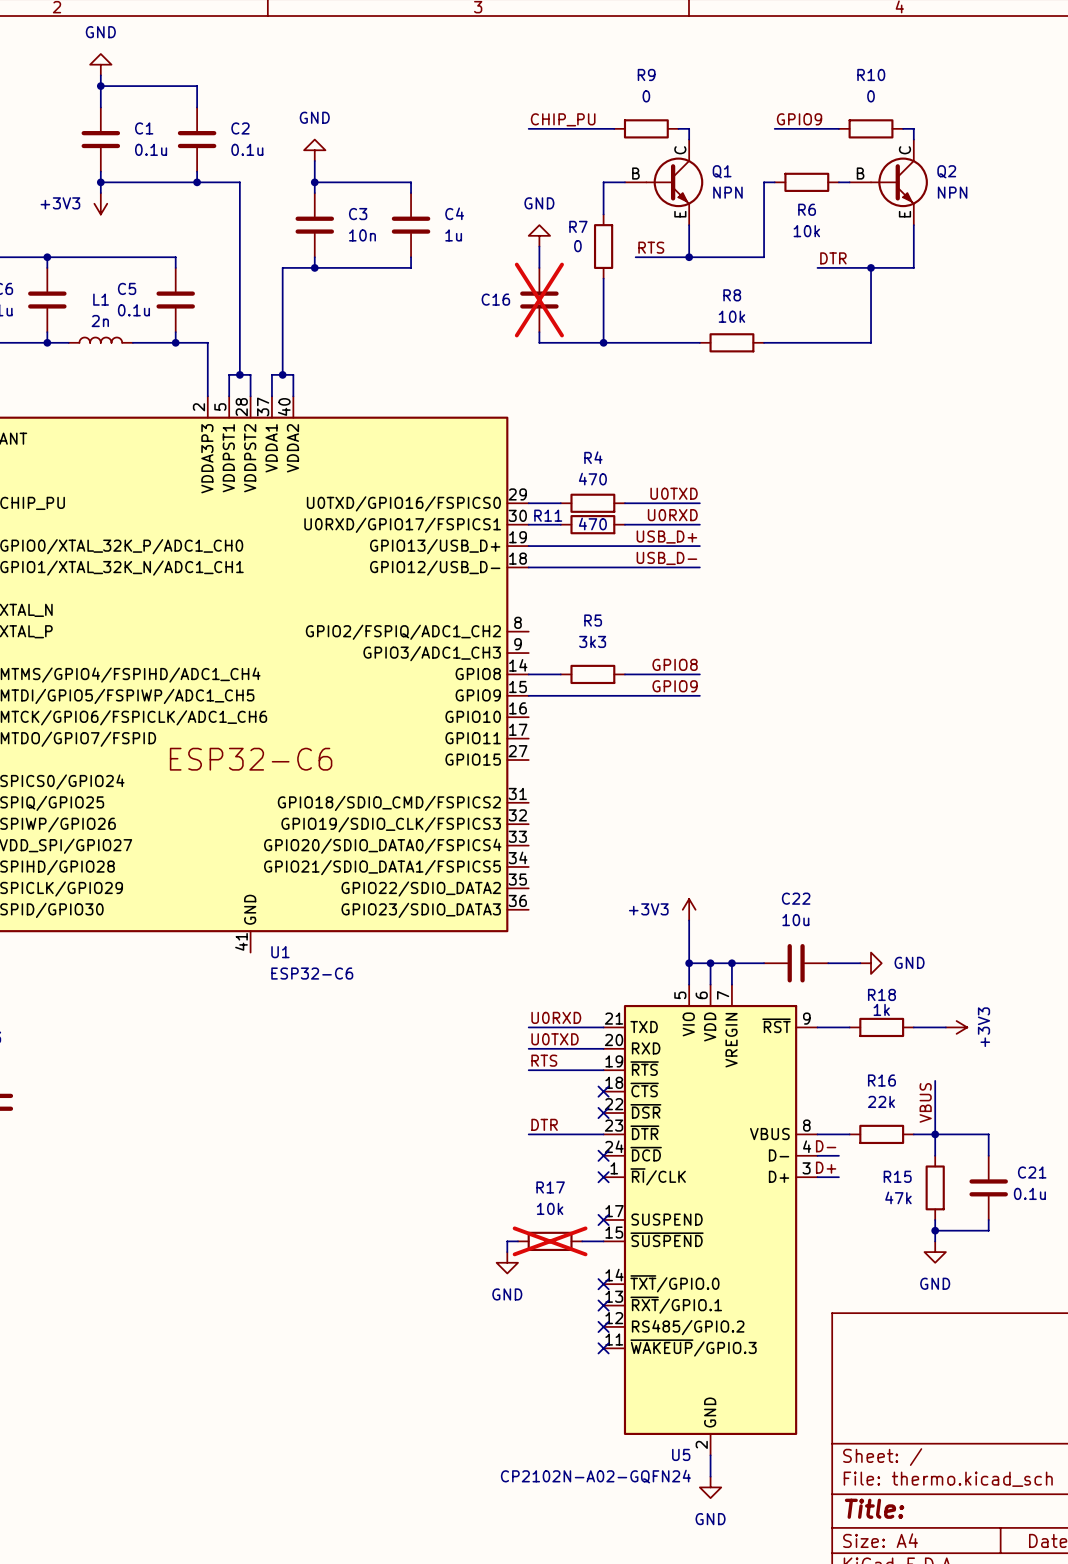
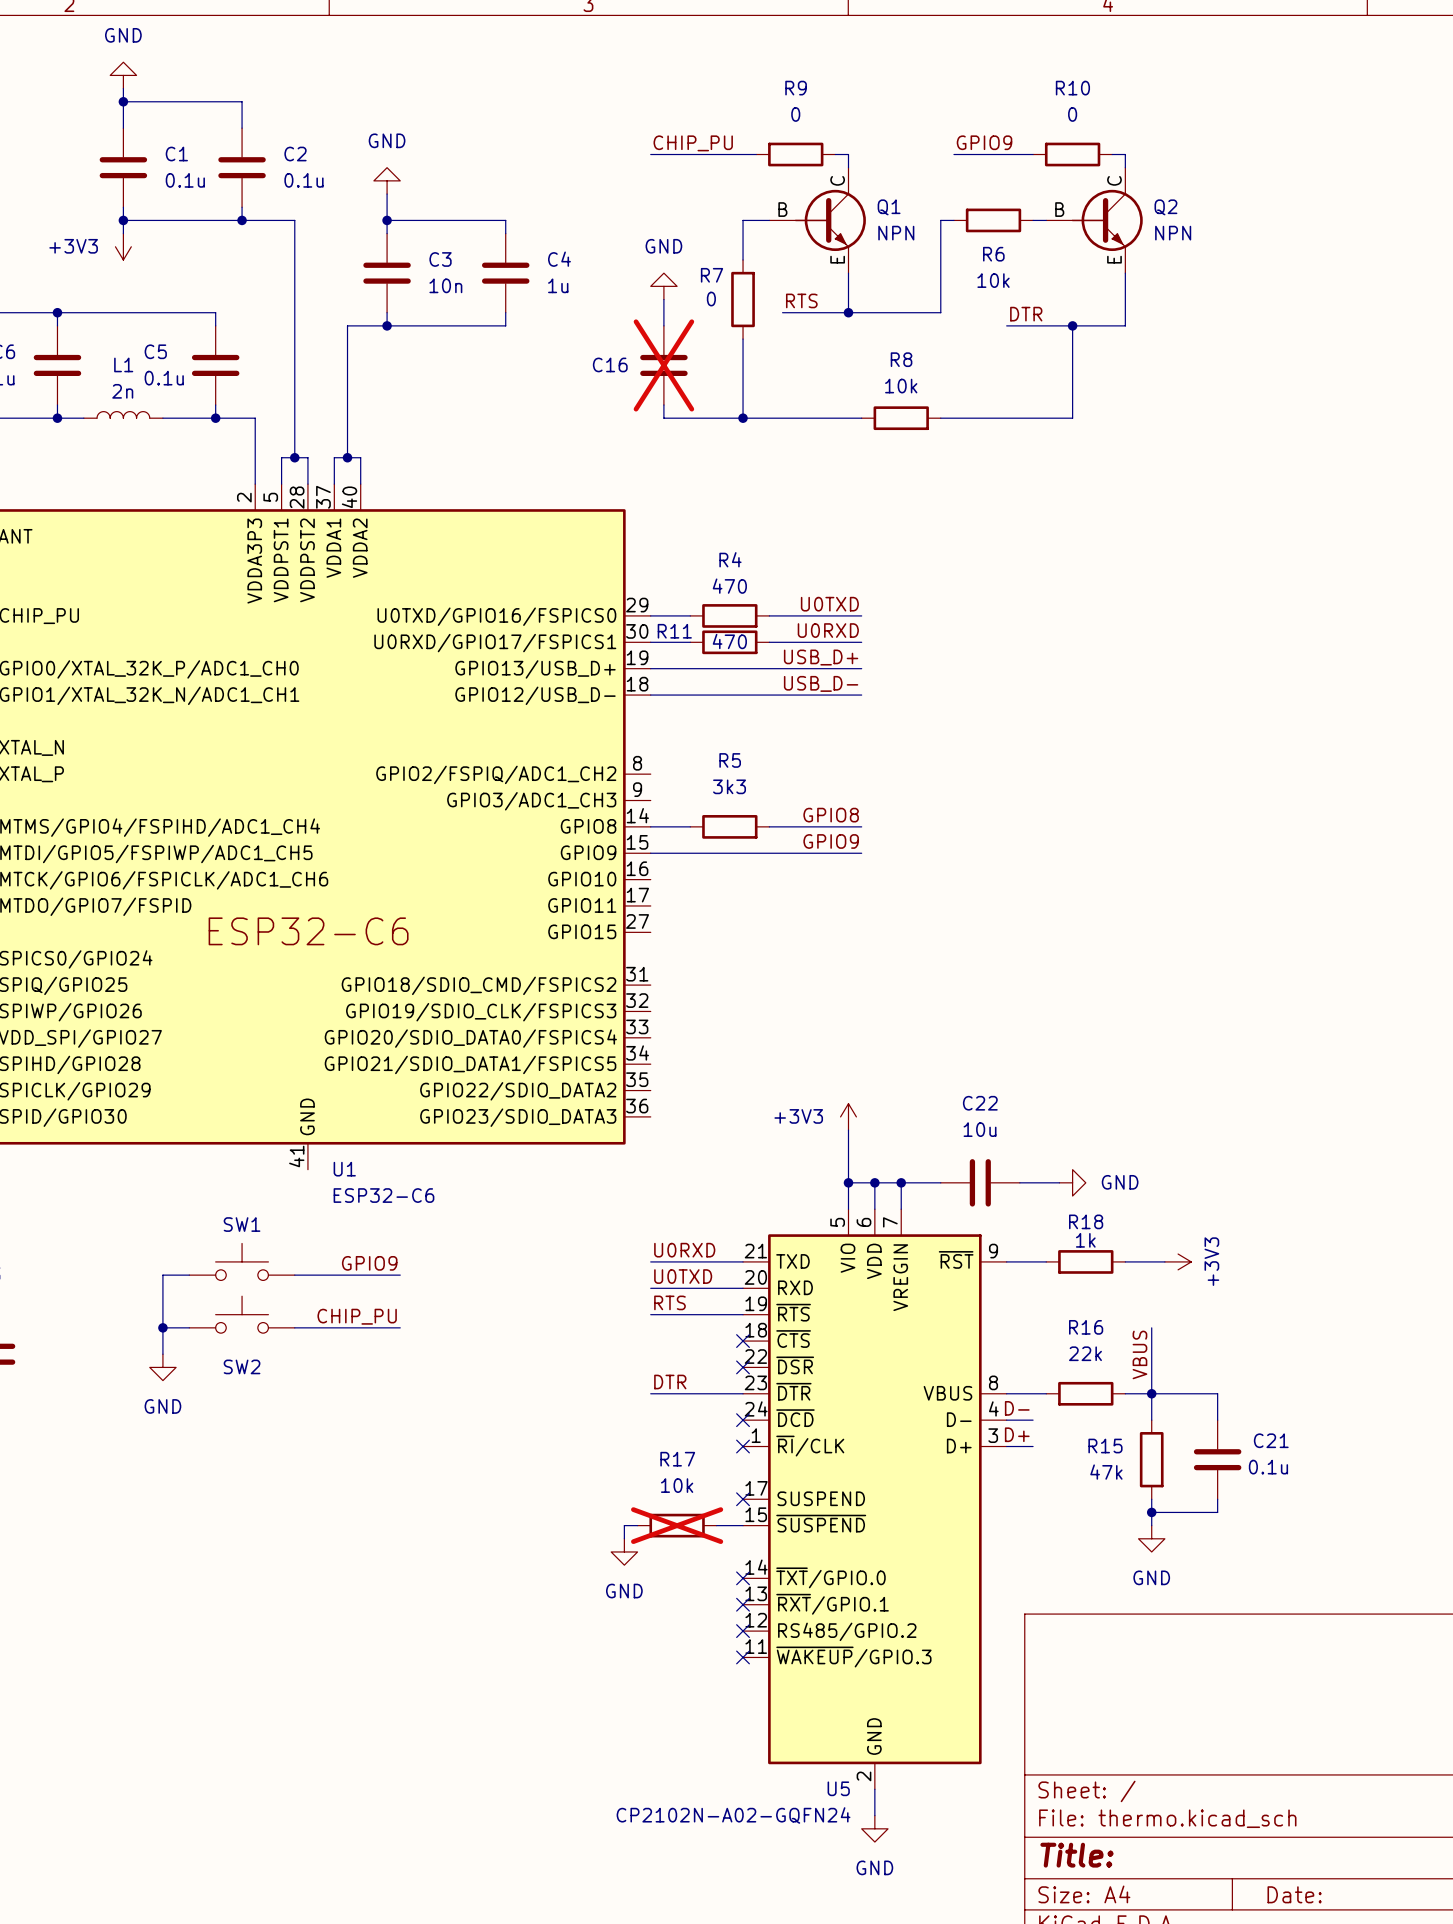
SW1: none -> (242, 1261)
label: none -> GPIO9 (369, 1263)
wire: none -> (189, 1275) (162, 1275) (162, 1354)
wire: none -> (294, 1275) (400, 1275)
SW2: none -> (242, 1314)
label: none -> CHIP_PU (357, 1316)
wire: none -> (162, 1327) (189, 1327)
junction: none -> (162, 1327)
wire: none -> (294, 1327) (400, 1327)
power symbol: none -> GND (162, 1367)

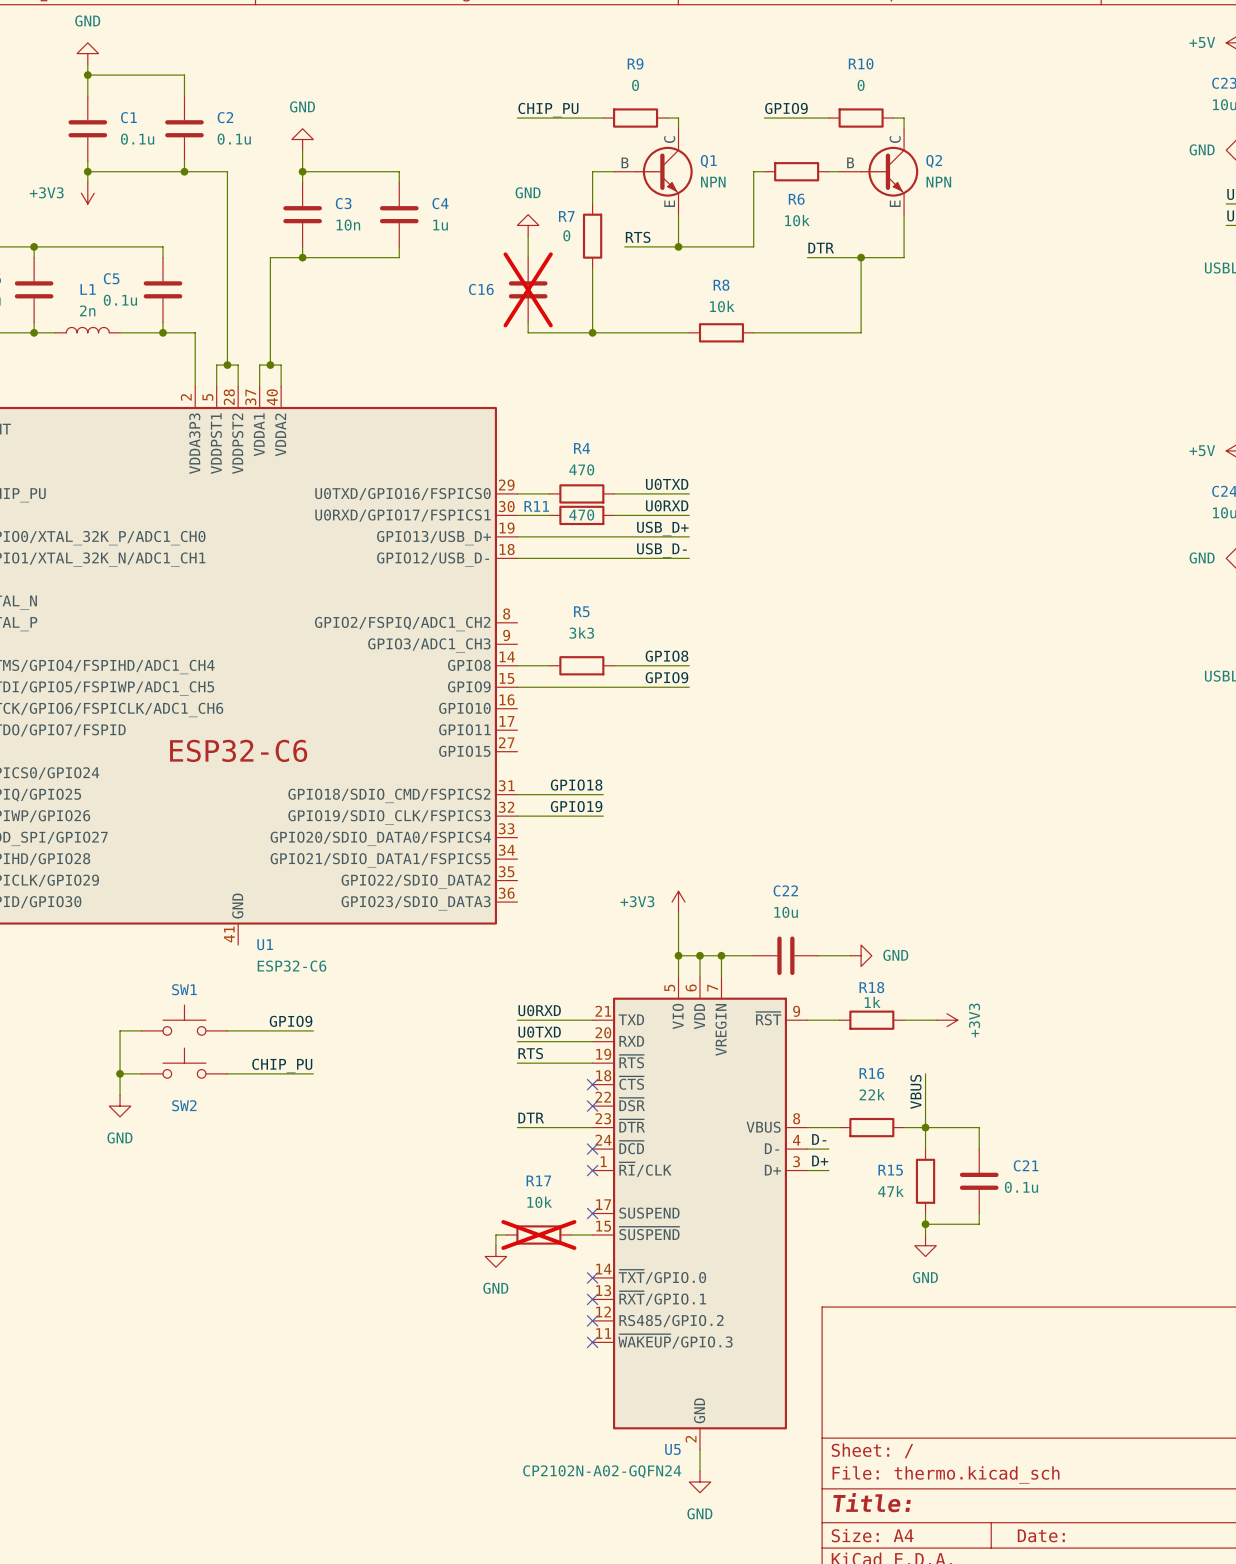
label: none -> GPIO18 (576, 785)
wire: none -> (517, 794) (603, 794)
label: none -> GPIO19 (576, 806)
wire: none -> (517, 816) (603, 816)

